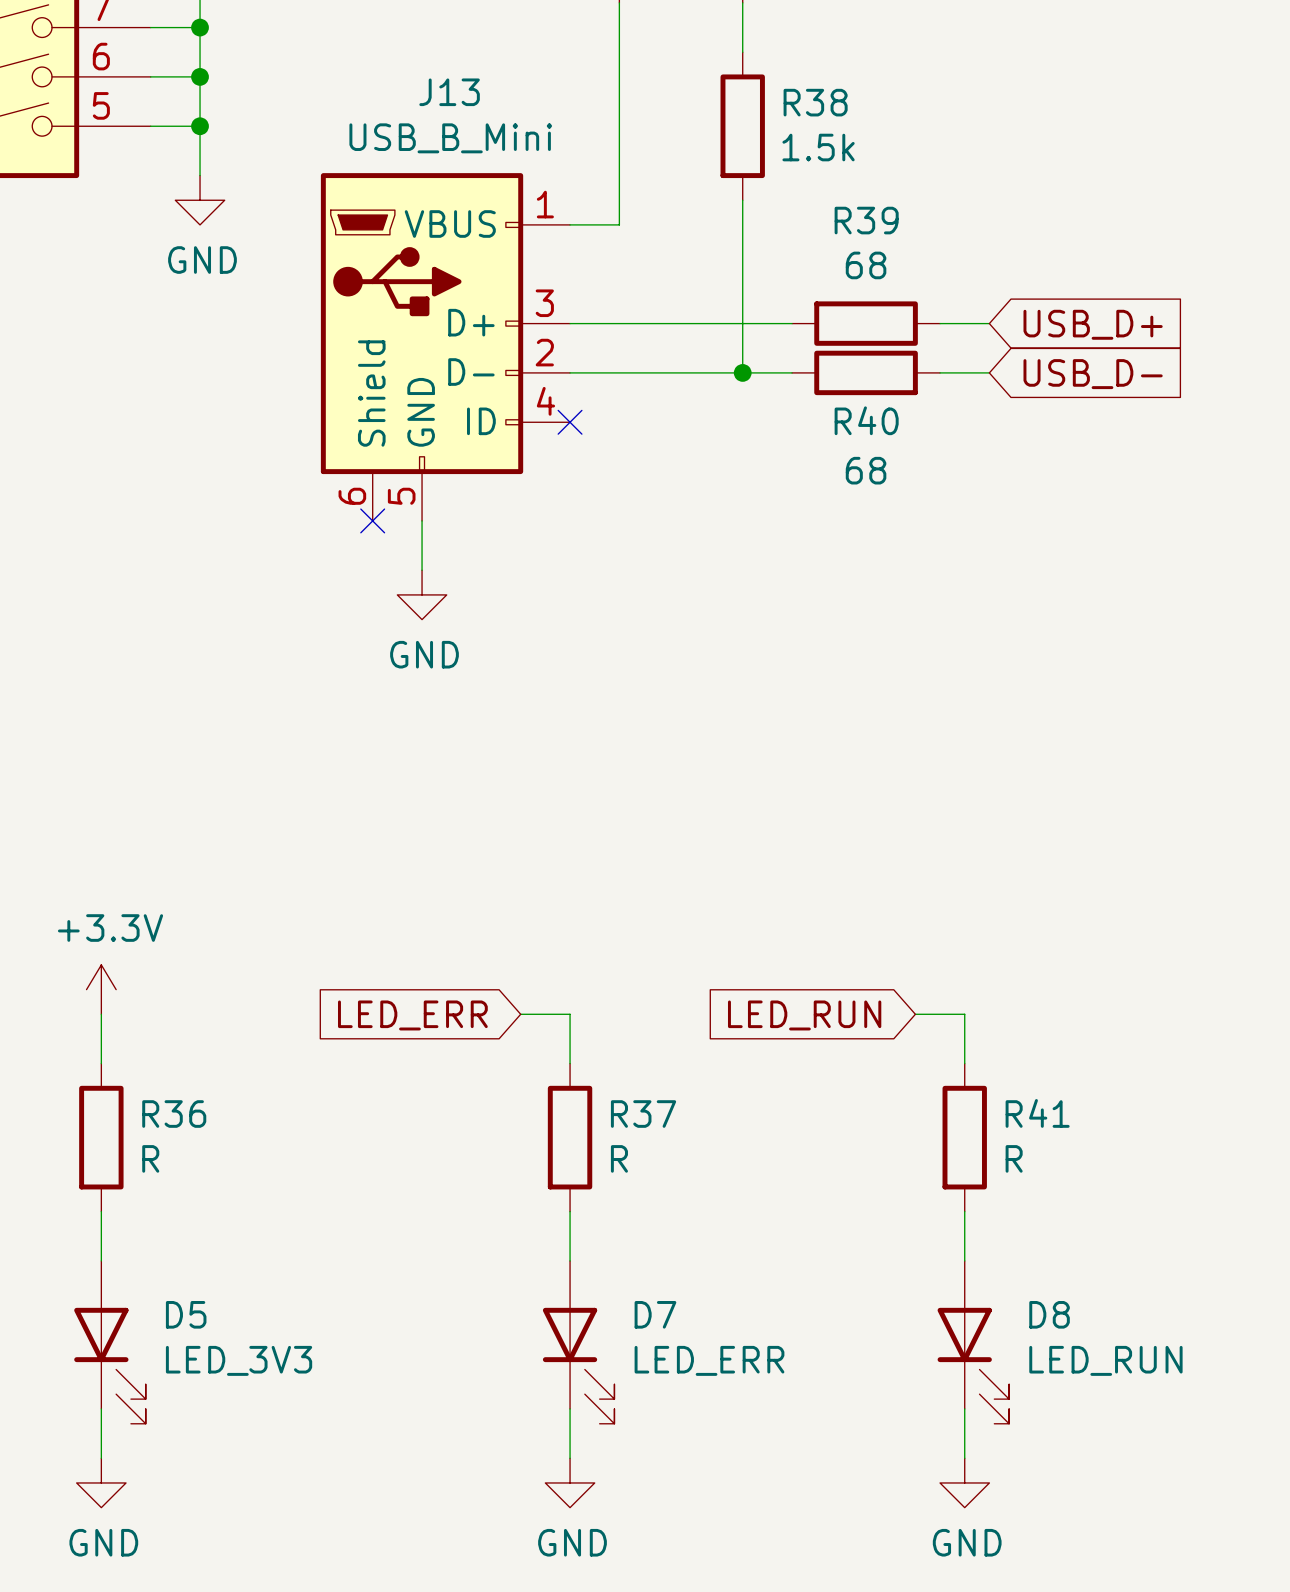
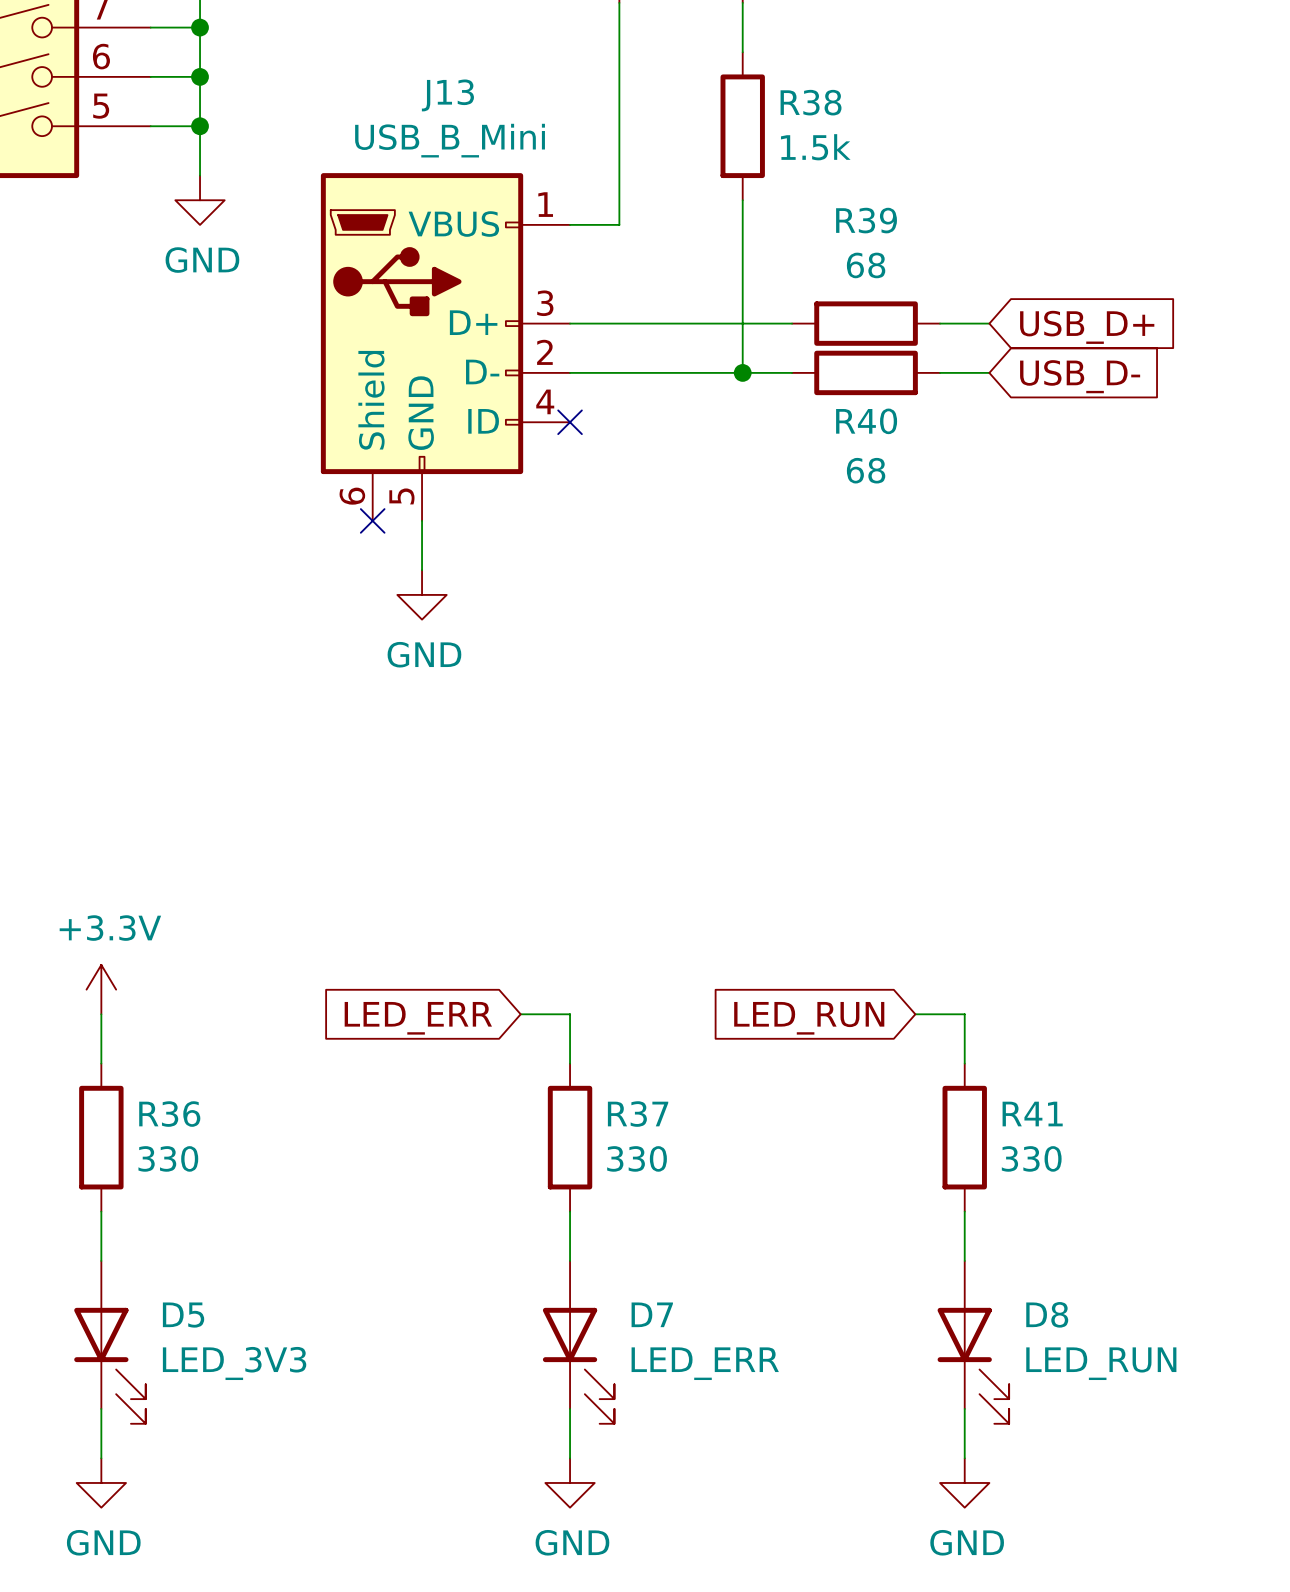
R36 value: R (150, 1158) -> 330 (168, 1158)
R37 value: R (619, 1158) -> 330 (637, 1158)
R41 value: R (1014, 1158) -> 330 (1031, 1158)

